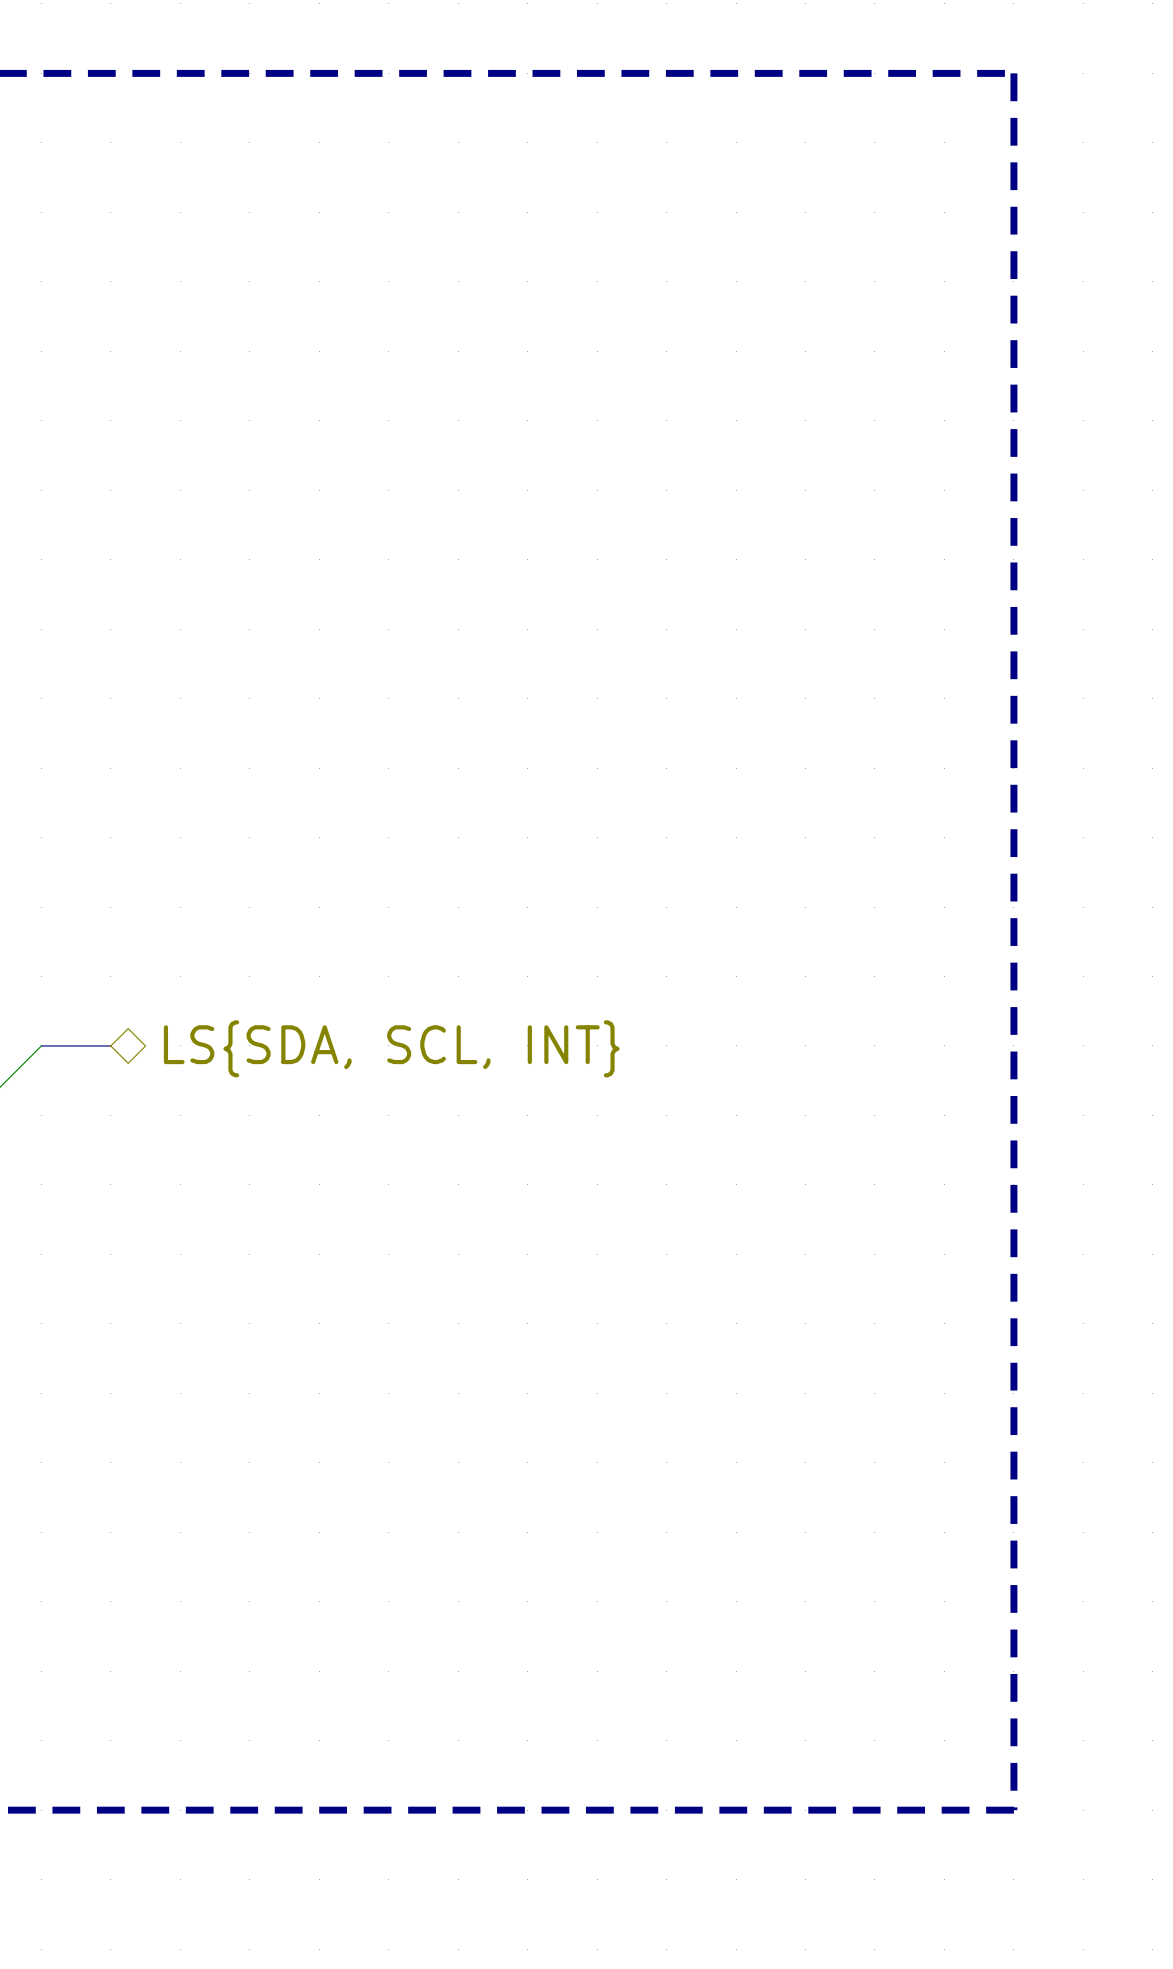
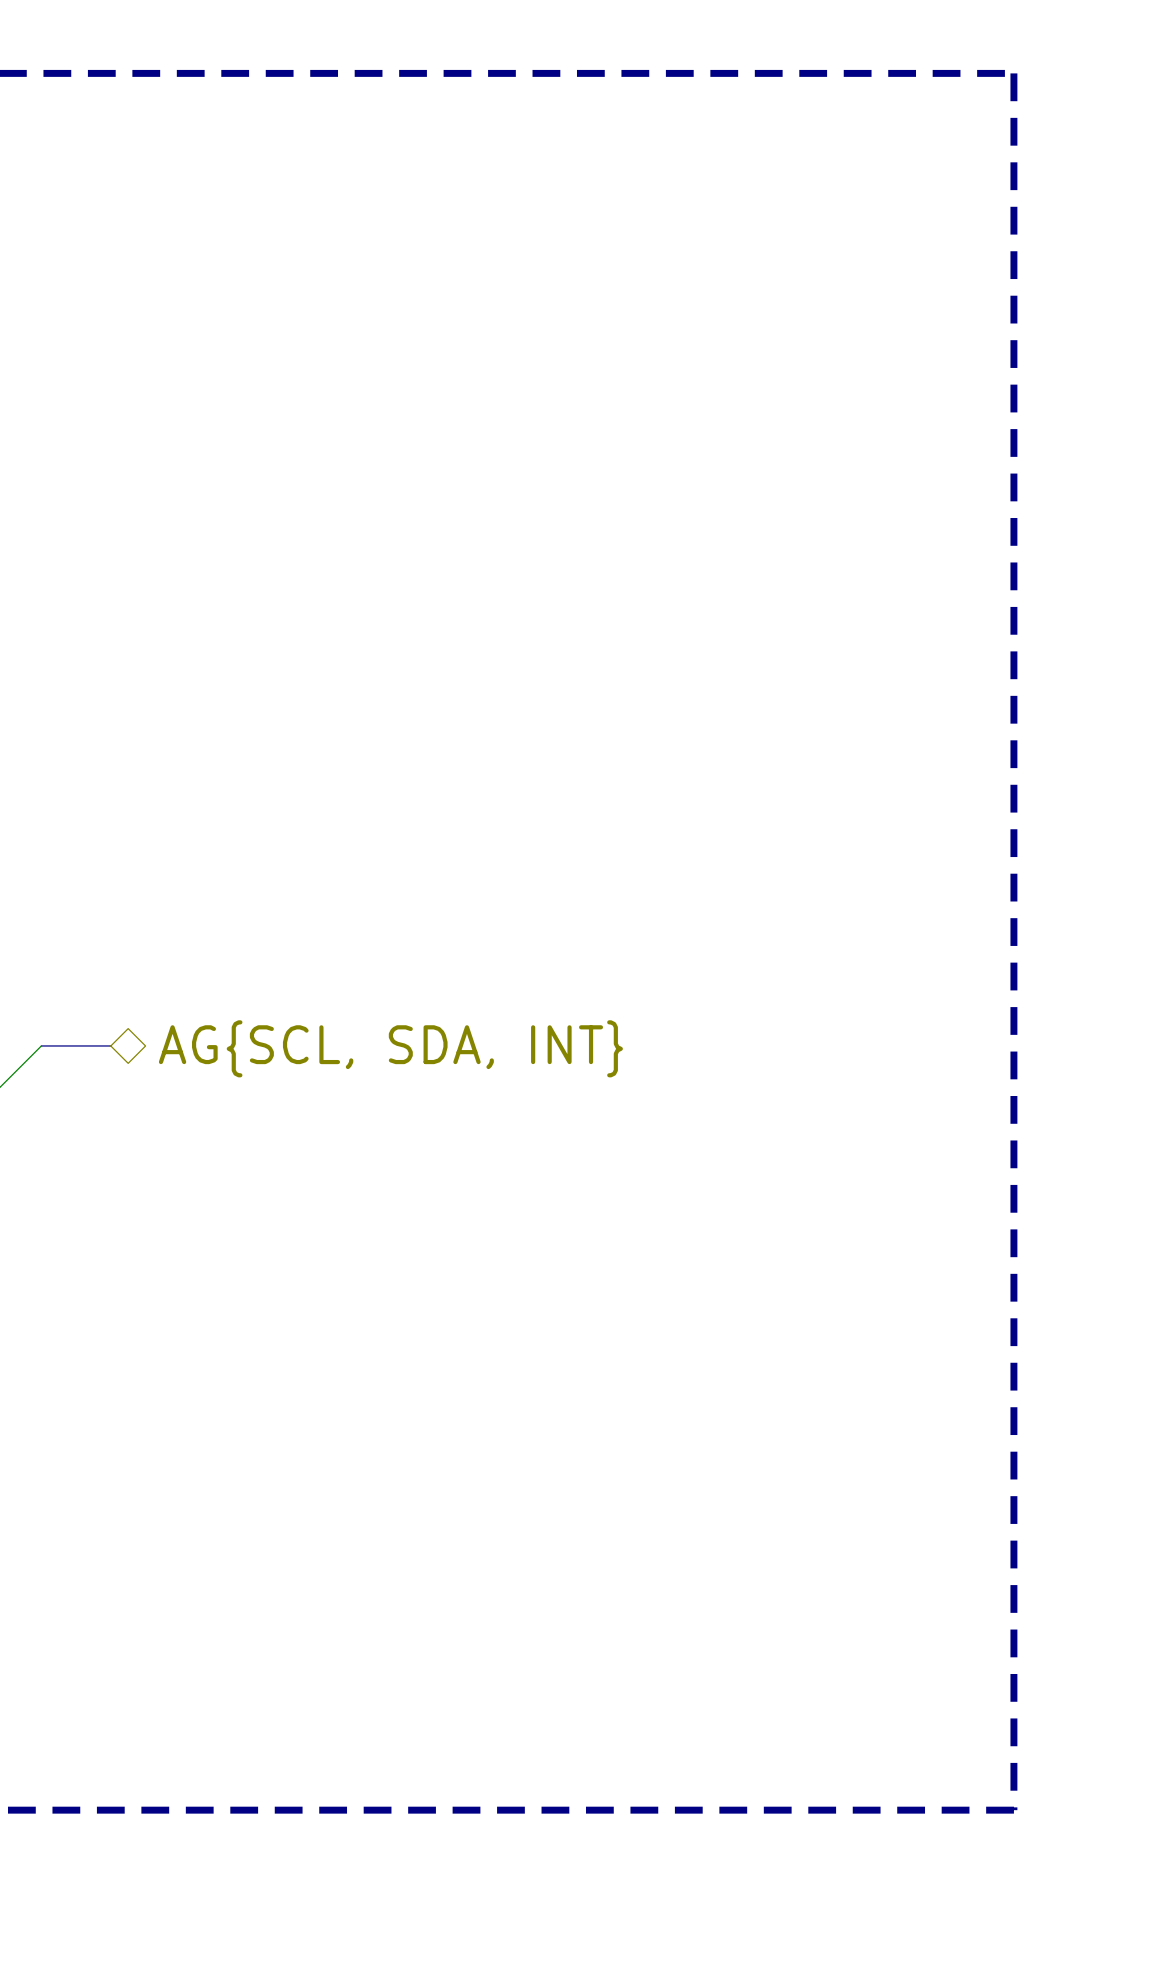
hierarchical label: LS{SDA, SCL, INT} (391, 1048) -> AG{SCL, SDA, INT} (390, 1048)

